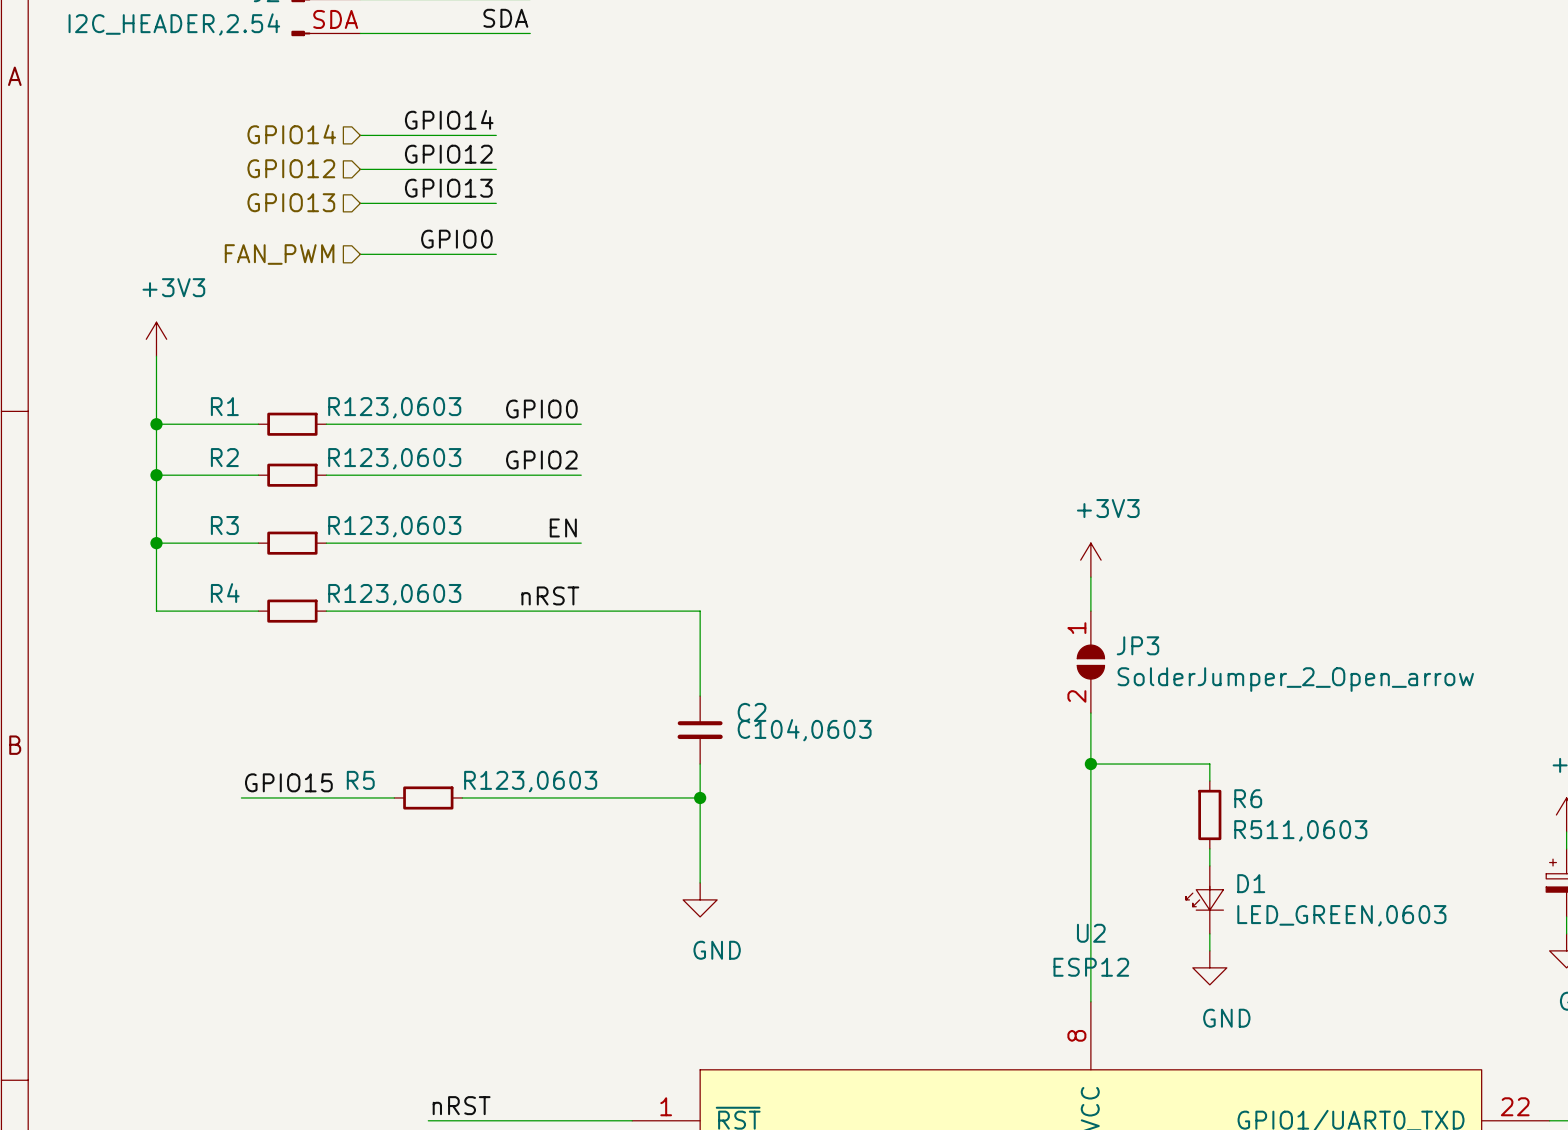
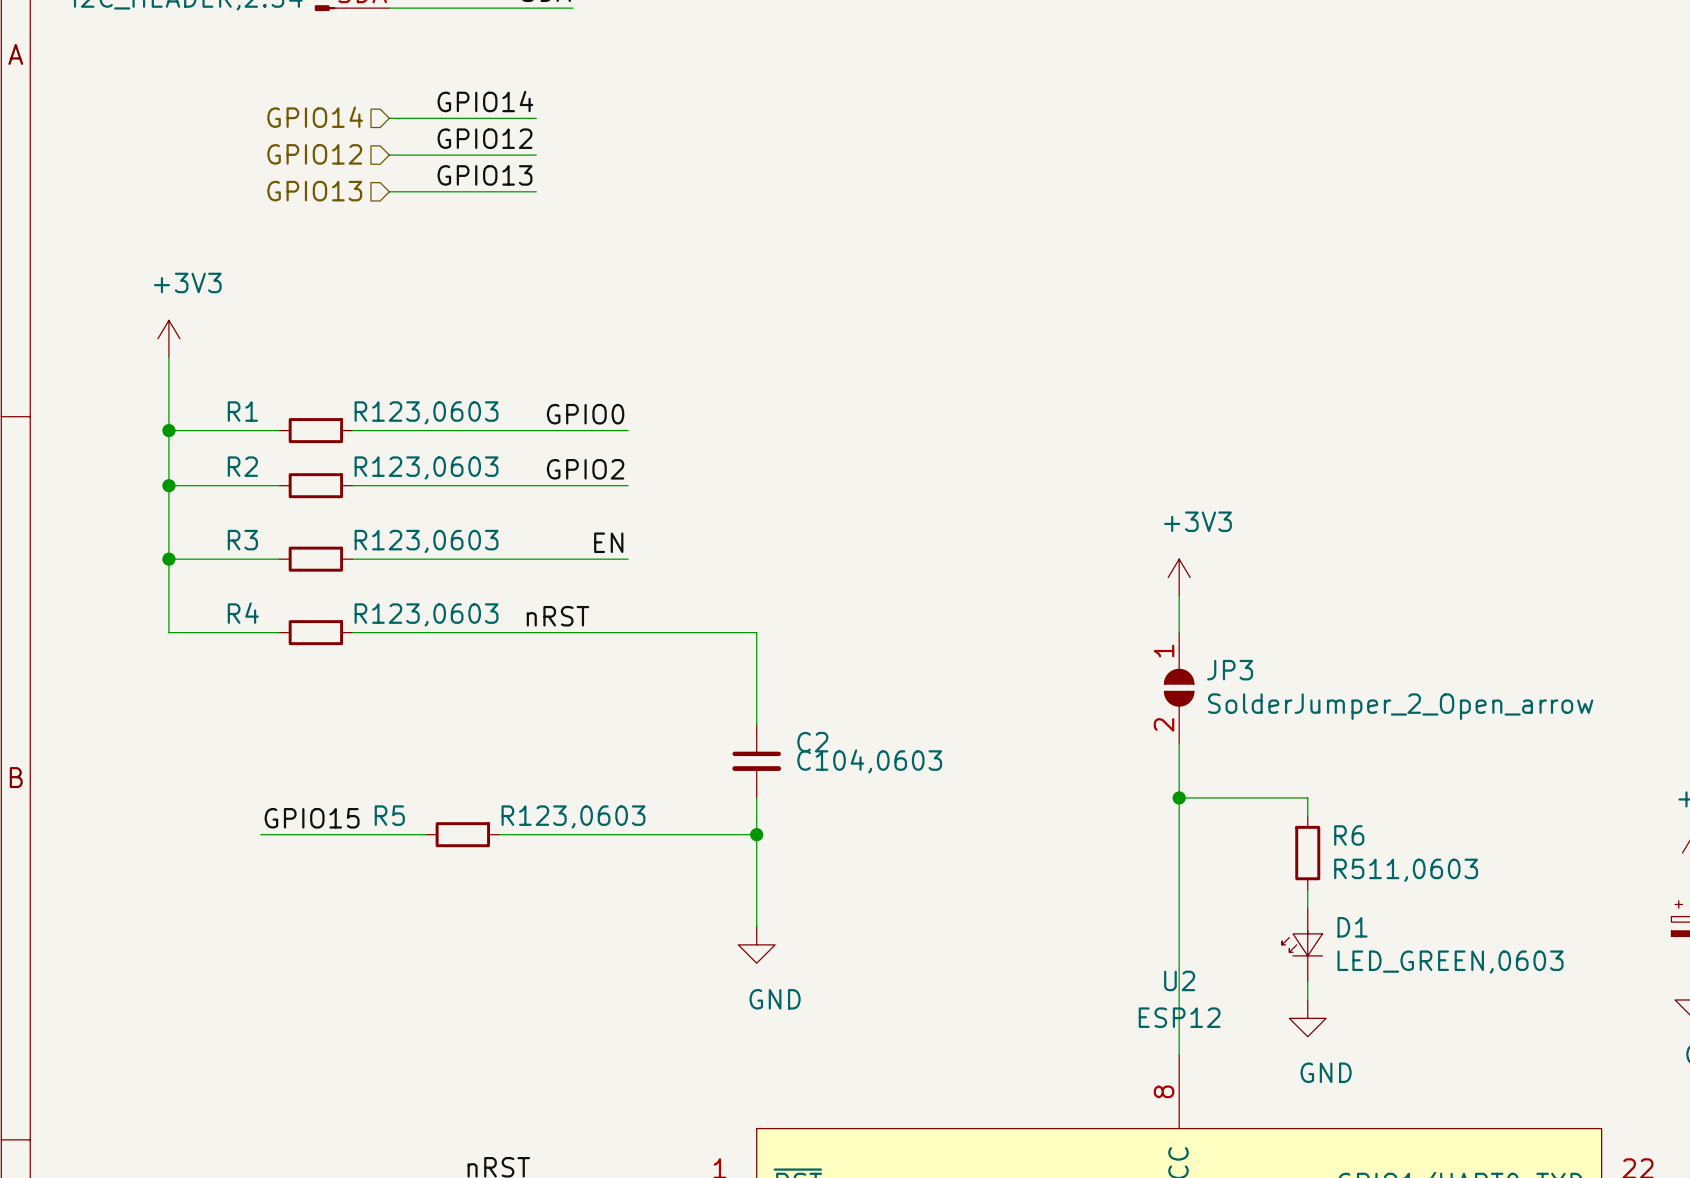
label: GPIO0 (456, 239) -> none
hierarchical label: FAN_PWM (279, 254) -> none
wire: (360, 254) (496, 254) -> none
label position: nRST (550, 595) -> nRST (558, 616)

